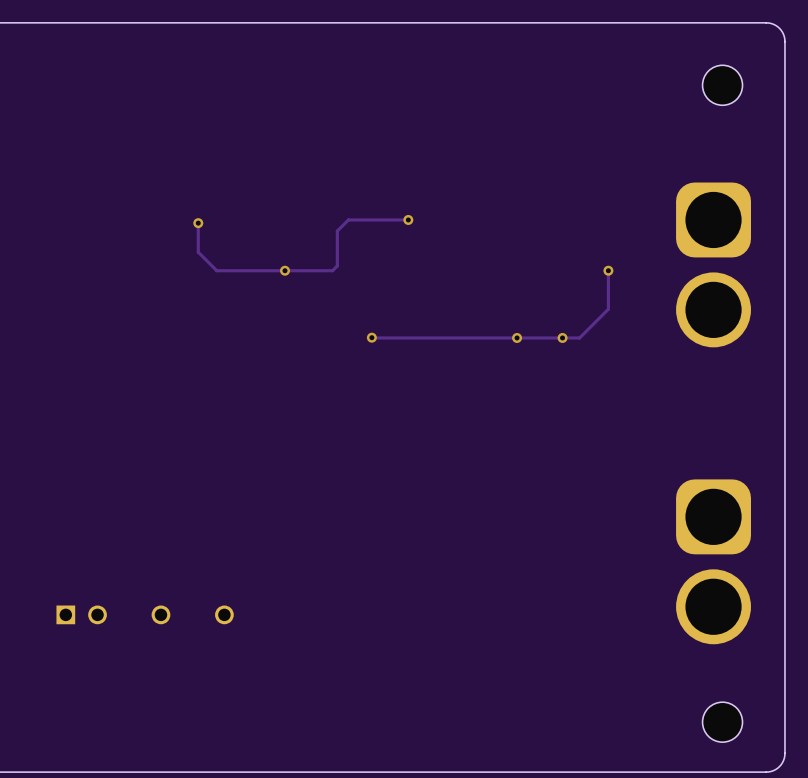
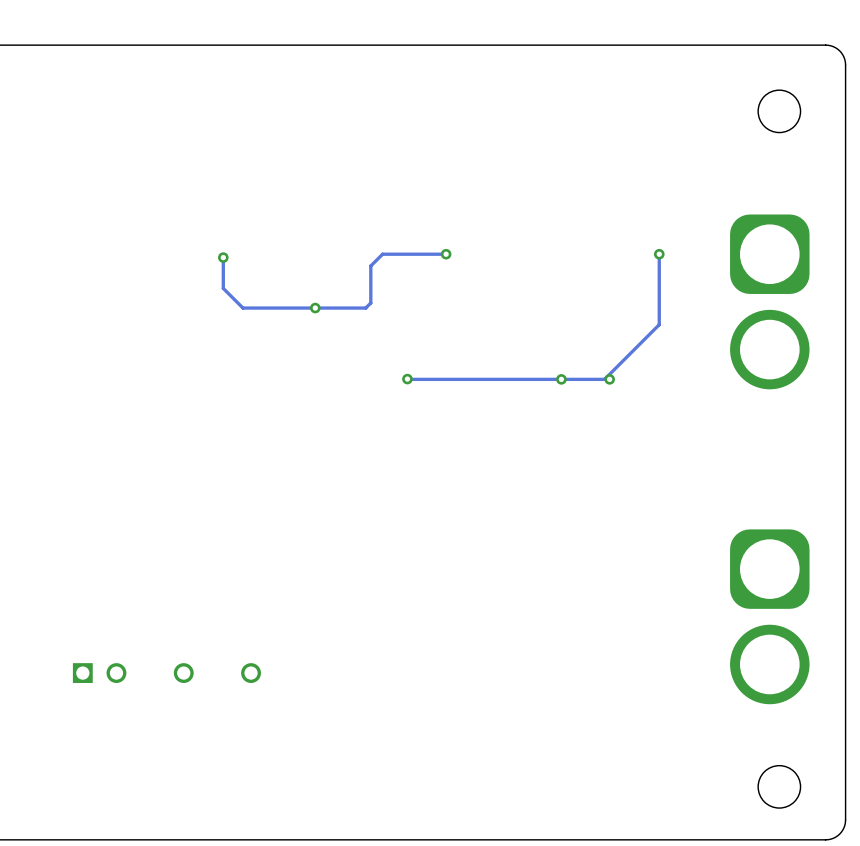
track: (608, 270) (608, 309) (579, 337) (557, 337) -> (659, 254) (659, 324) (604, 379)
via position: (608, 270) -> (659, 254)

